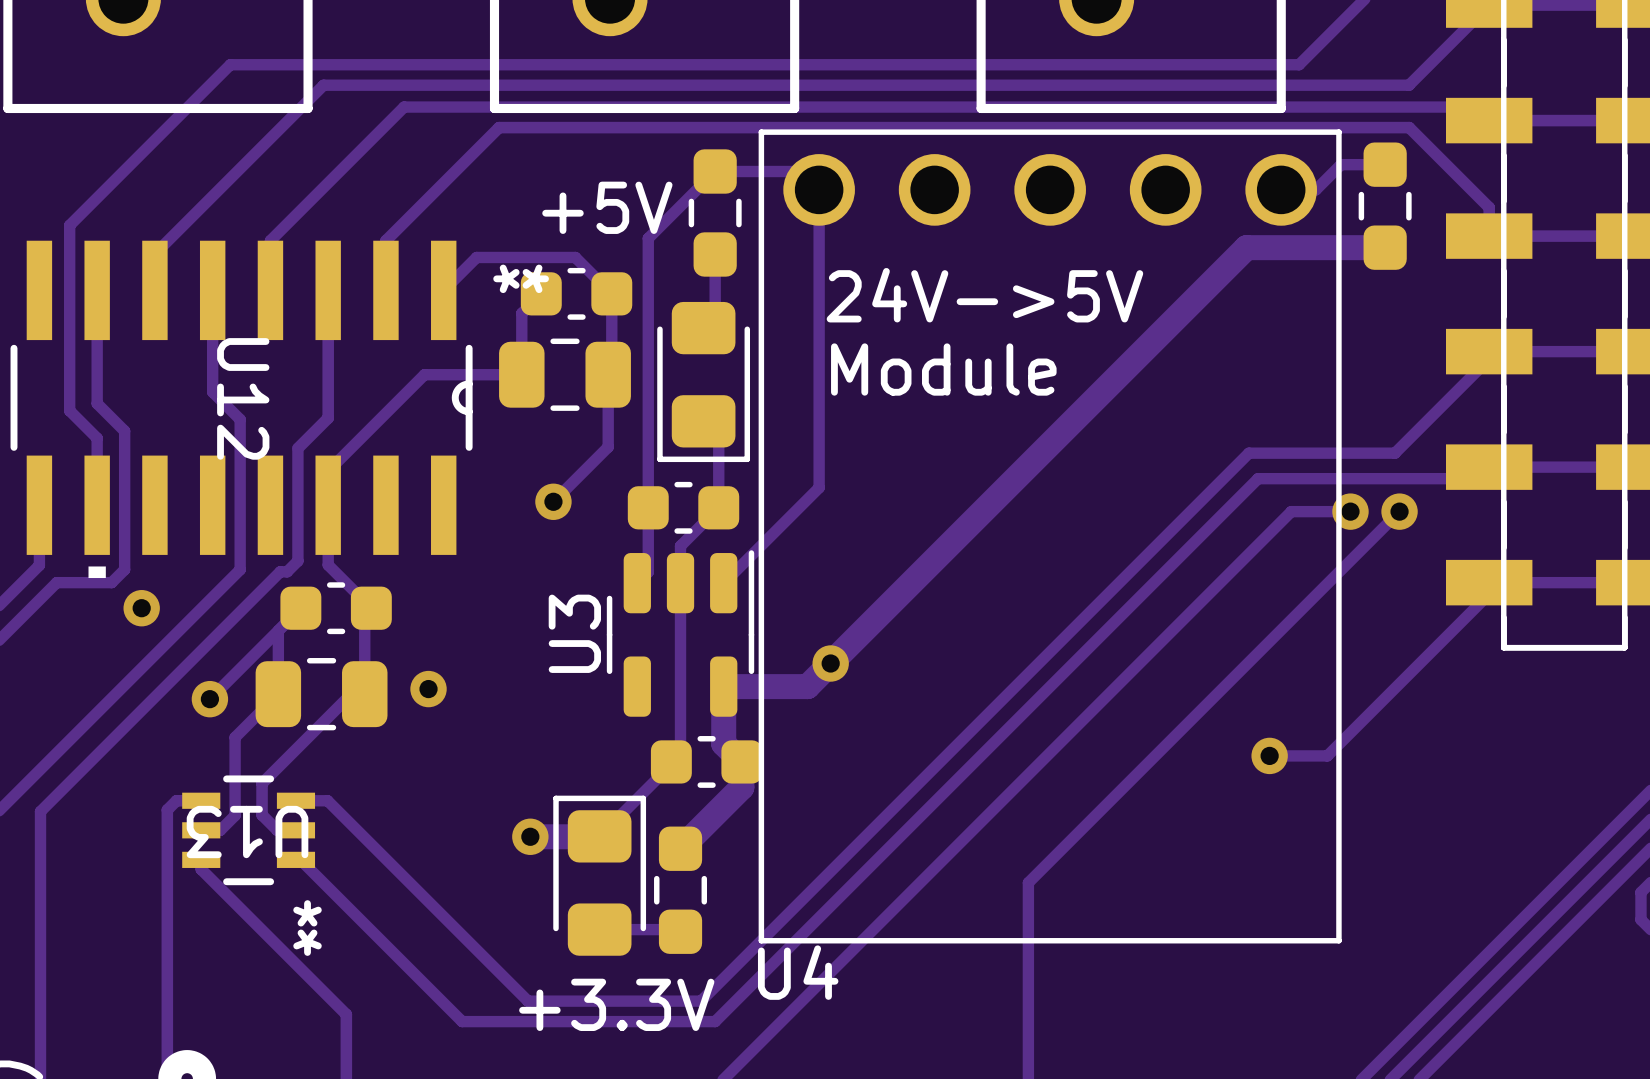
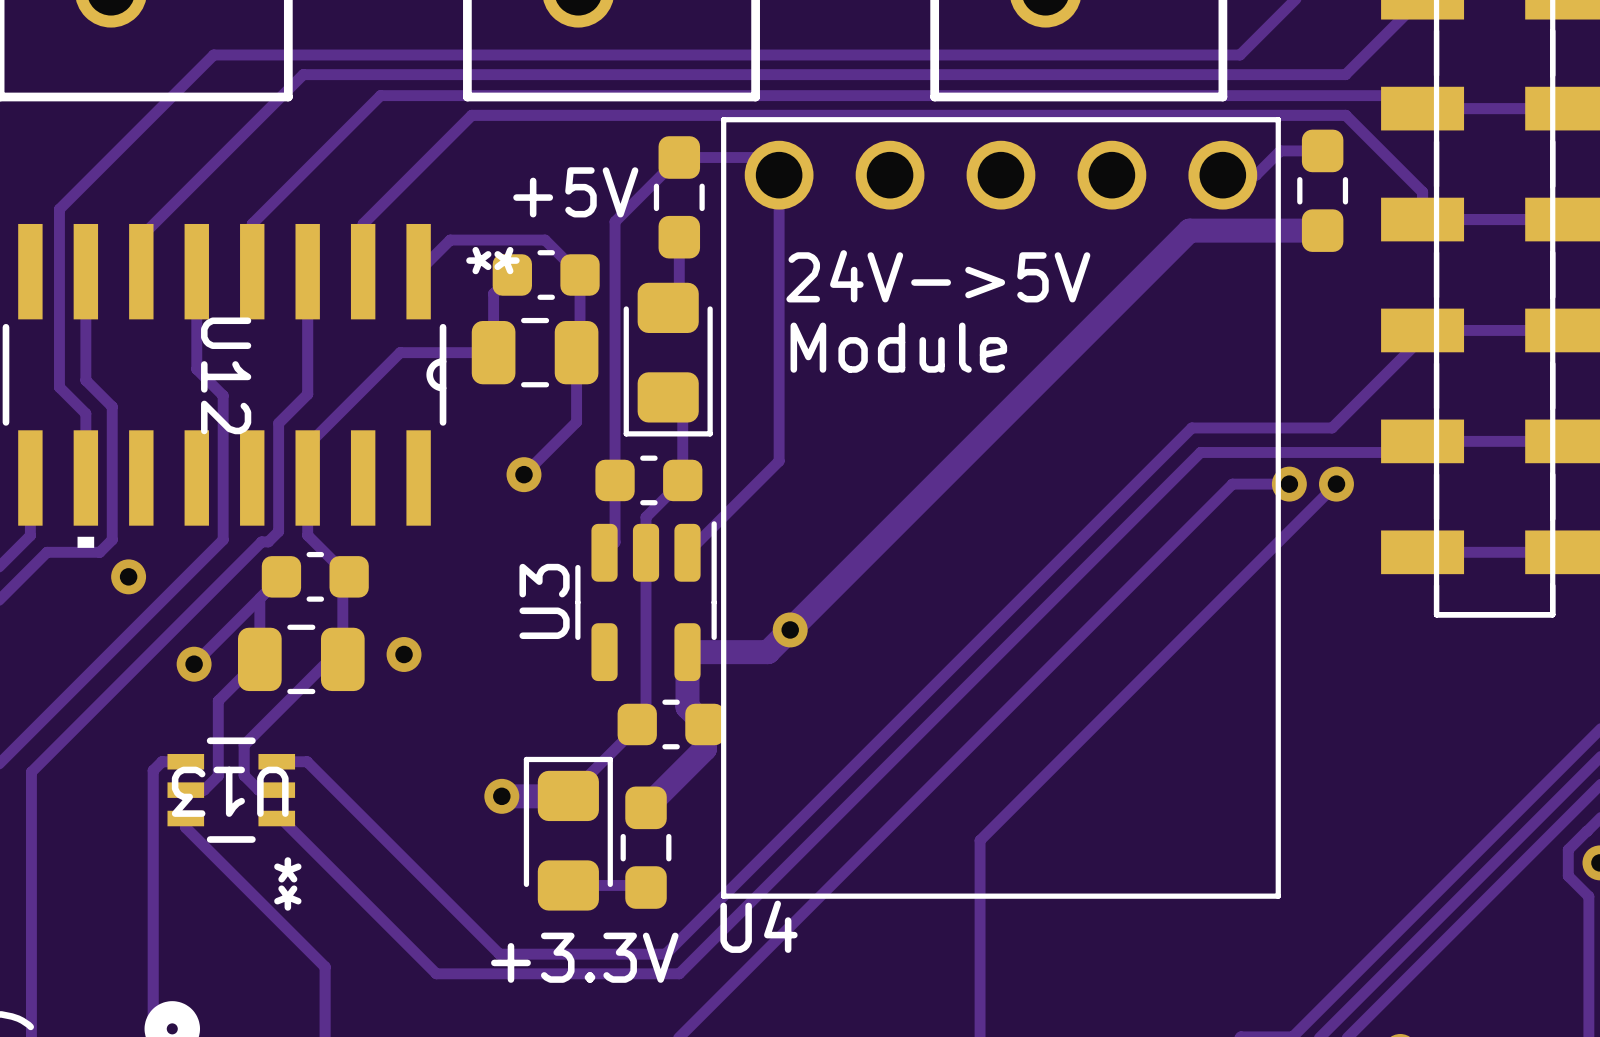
track: (1489, 582) (1489, 594) (1327, 755) (1269, 755) -> none
via: (1269, 755) -> none

